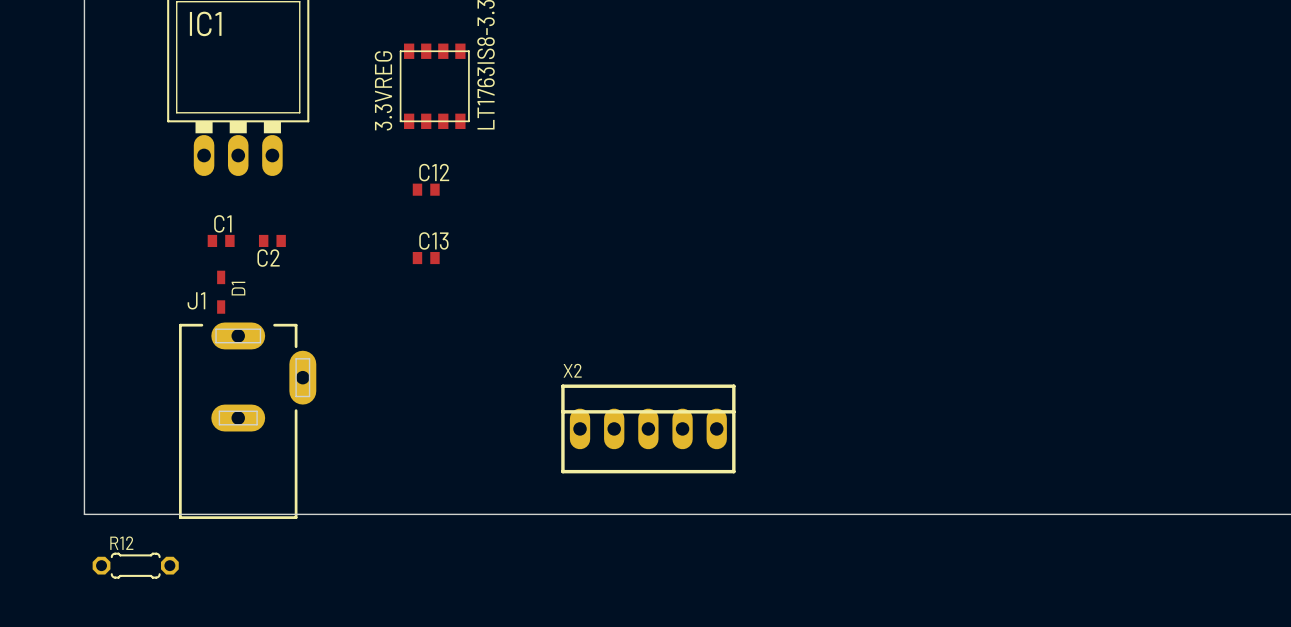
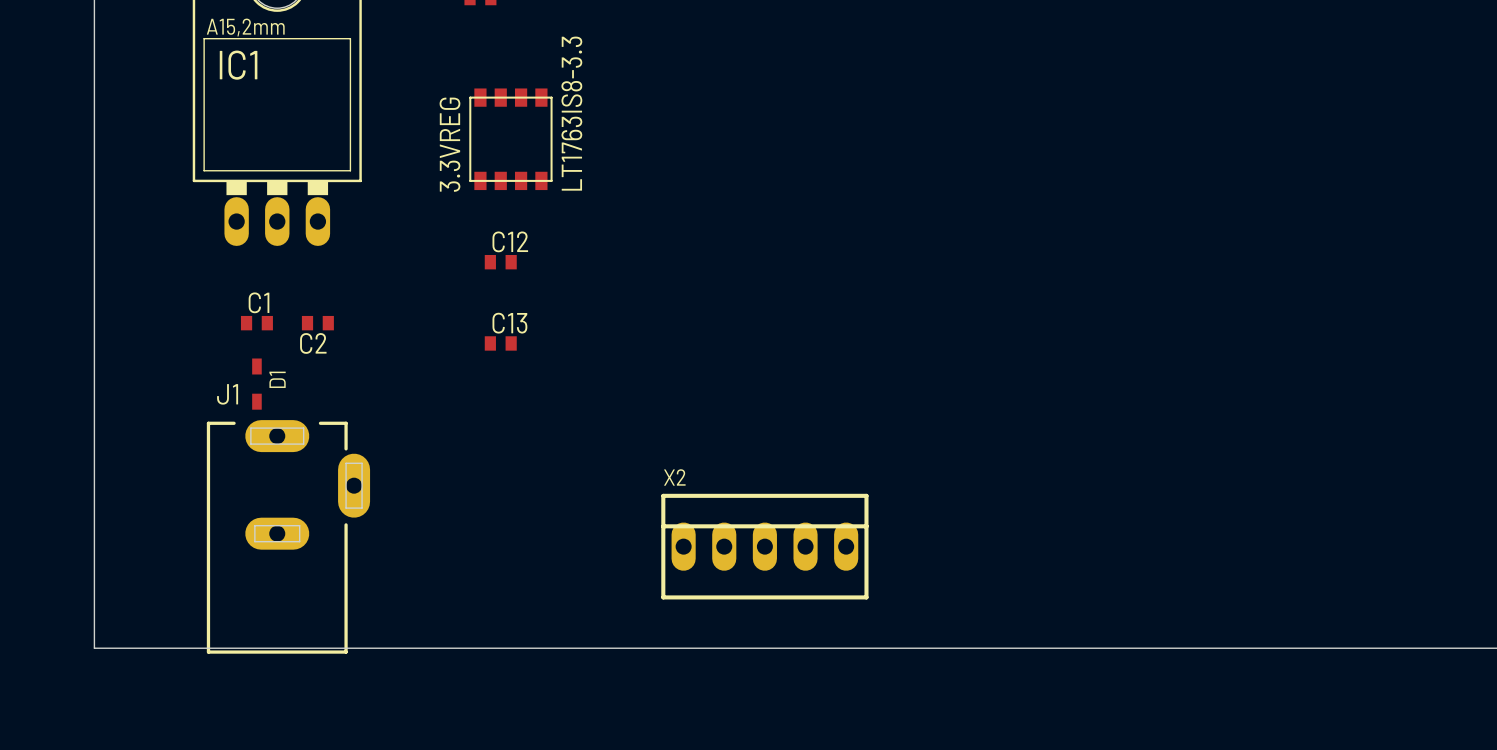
R12: (135, 565) -> none

